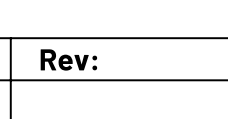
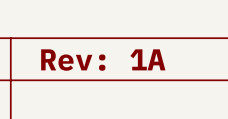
title block: Rev: (68, 59) -> Rev: 1A (103, 60)

